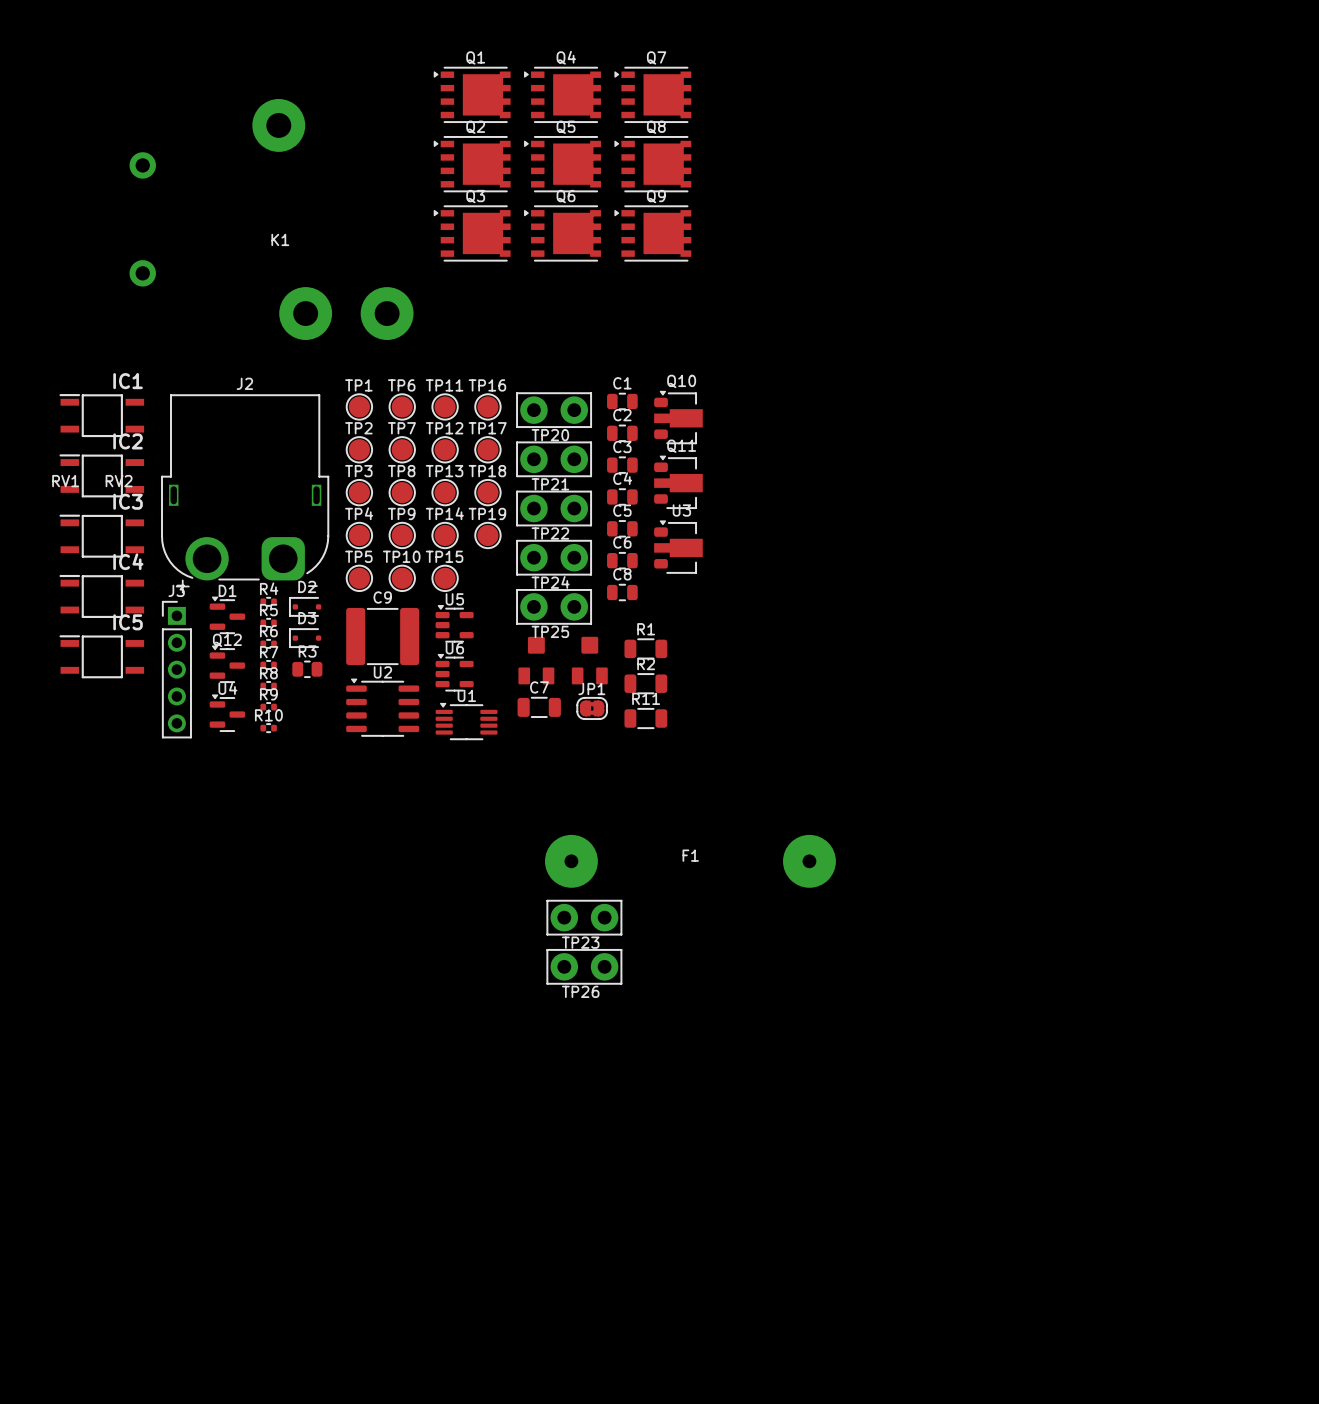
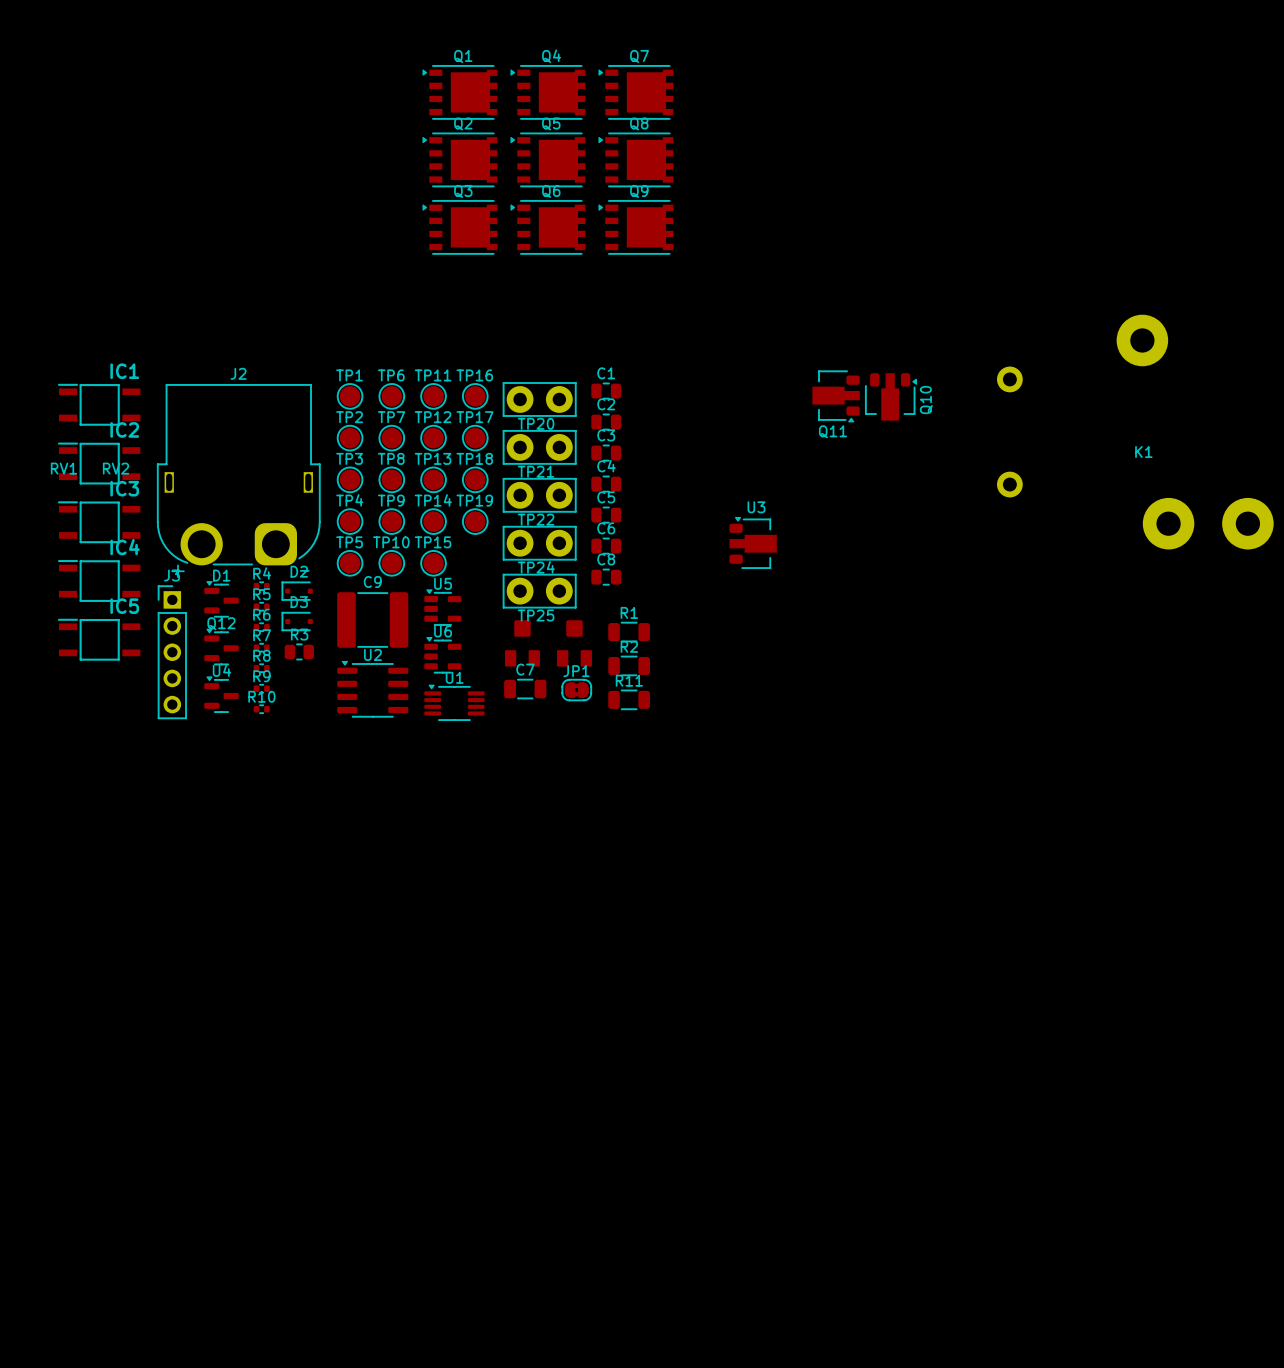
K1 position: (271, 219) -> (1135, 432)
Q10 rotation: 0° (678, 417) -> 90° clockwise (891, 396)
Q10 position: (678, 417) -> (891, 396)
Q11 rotation: 0° (678, 482) -> 180° (836, 396)
Q11 position: (678, 482) -> (836, 396)
U3 position: (678, 546) -> (753, 542)
F1: (690, 861) -> none
TP23: (584, 917) -> none
TP26: (584, 966) -> none

